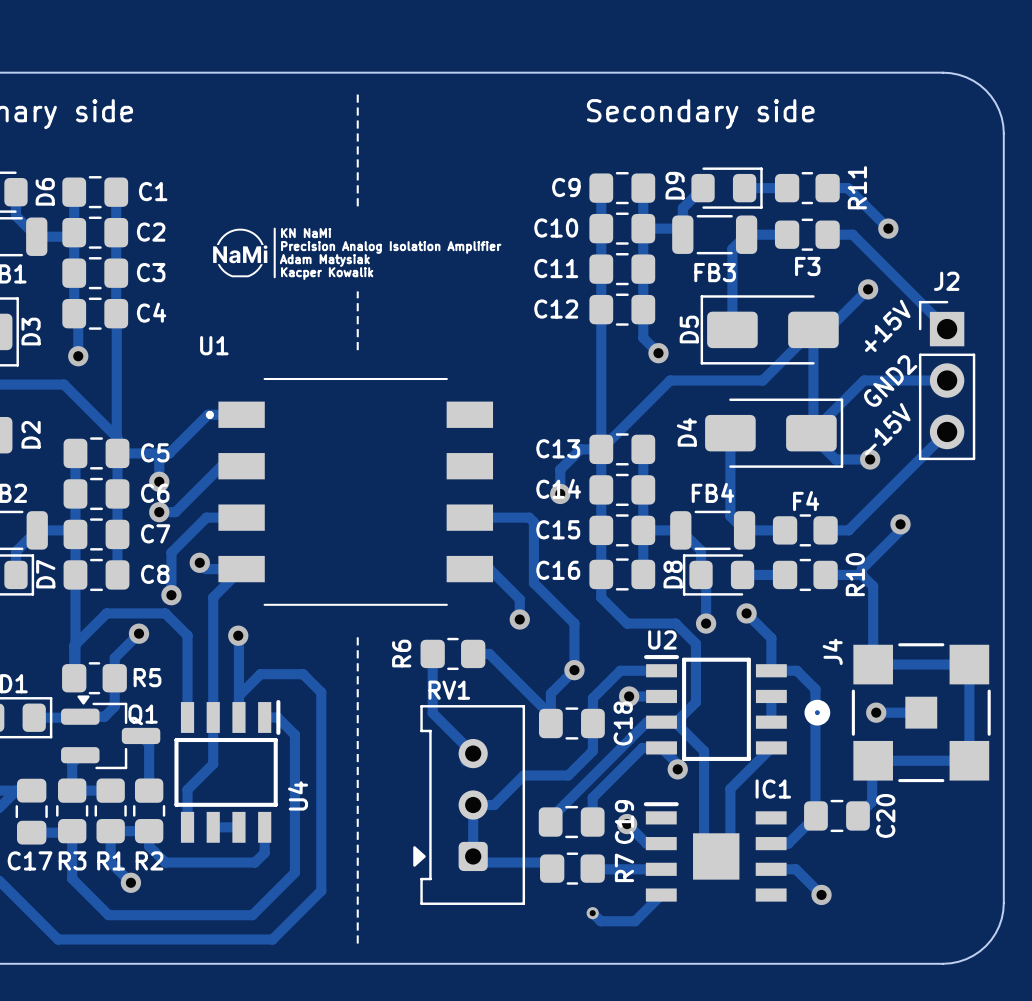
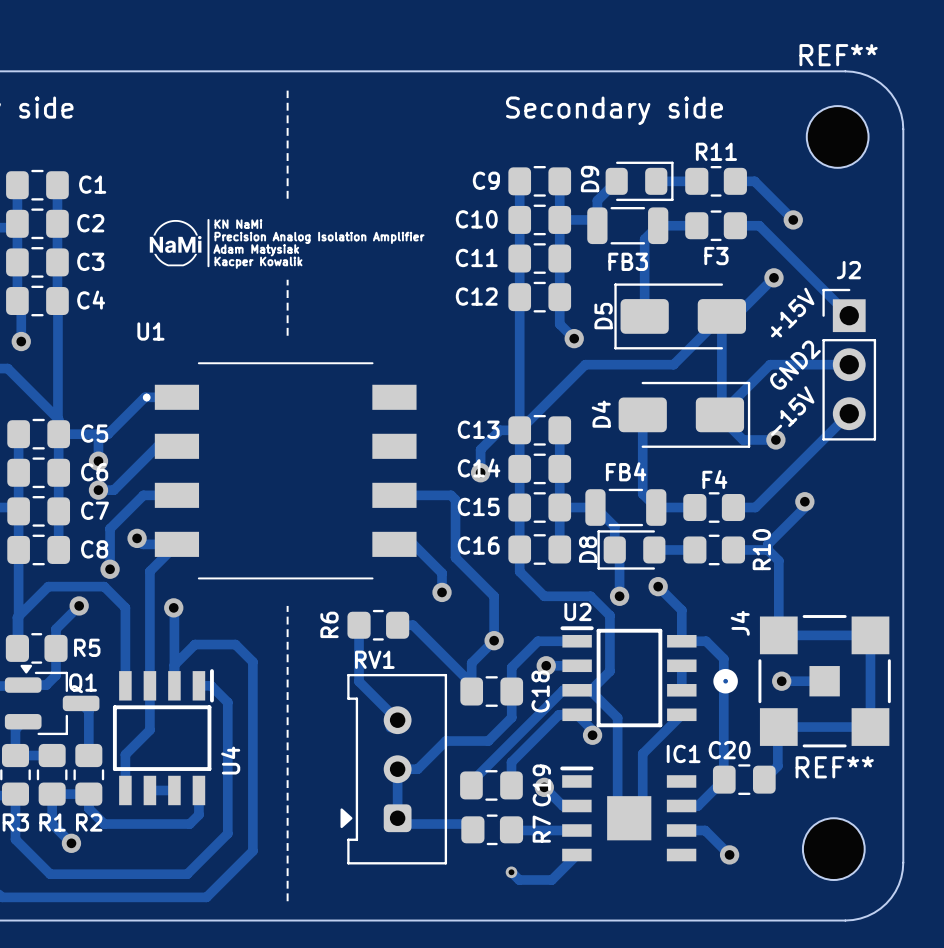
REF**: none -> (837, 136)
R11 name rotation: 0° (857, 187) -> 90° clockwise (716, 151)
R11 name position: R11 (857, 187) -> R11 (716, 151)
C20 name rotation: 0° (885, 815) -> 90° clockwise (729, 750)
C20 name position: C20 (885, 815) -> C20 (729, 750)
REF**: none -> (833, 849)

